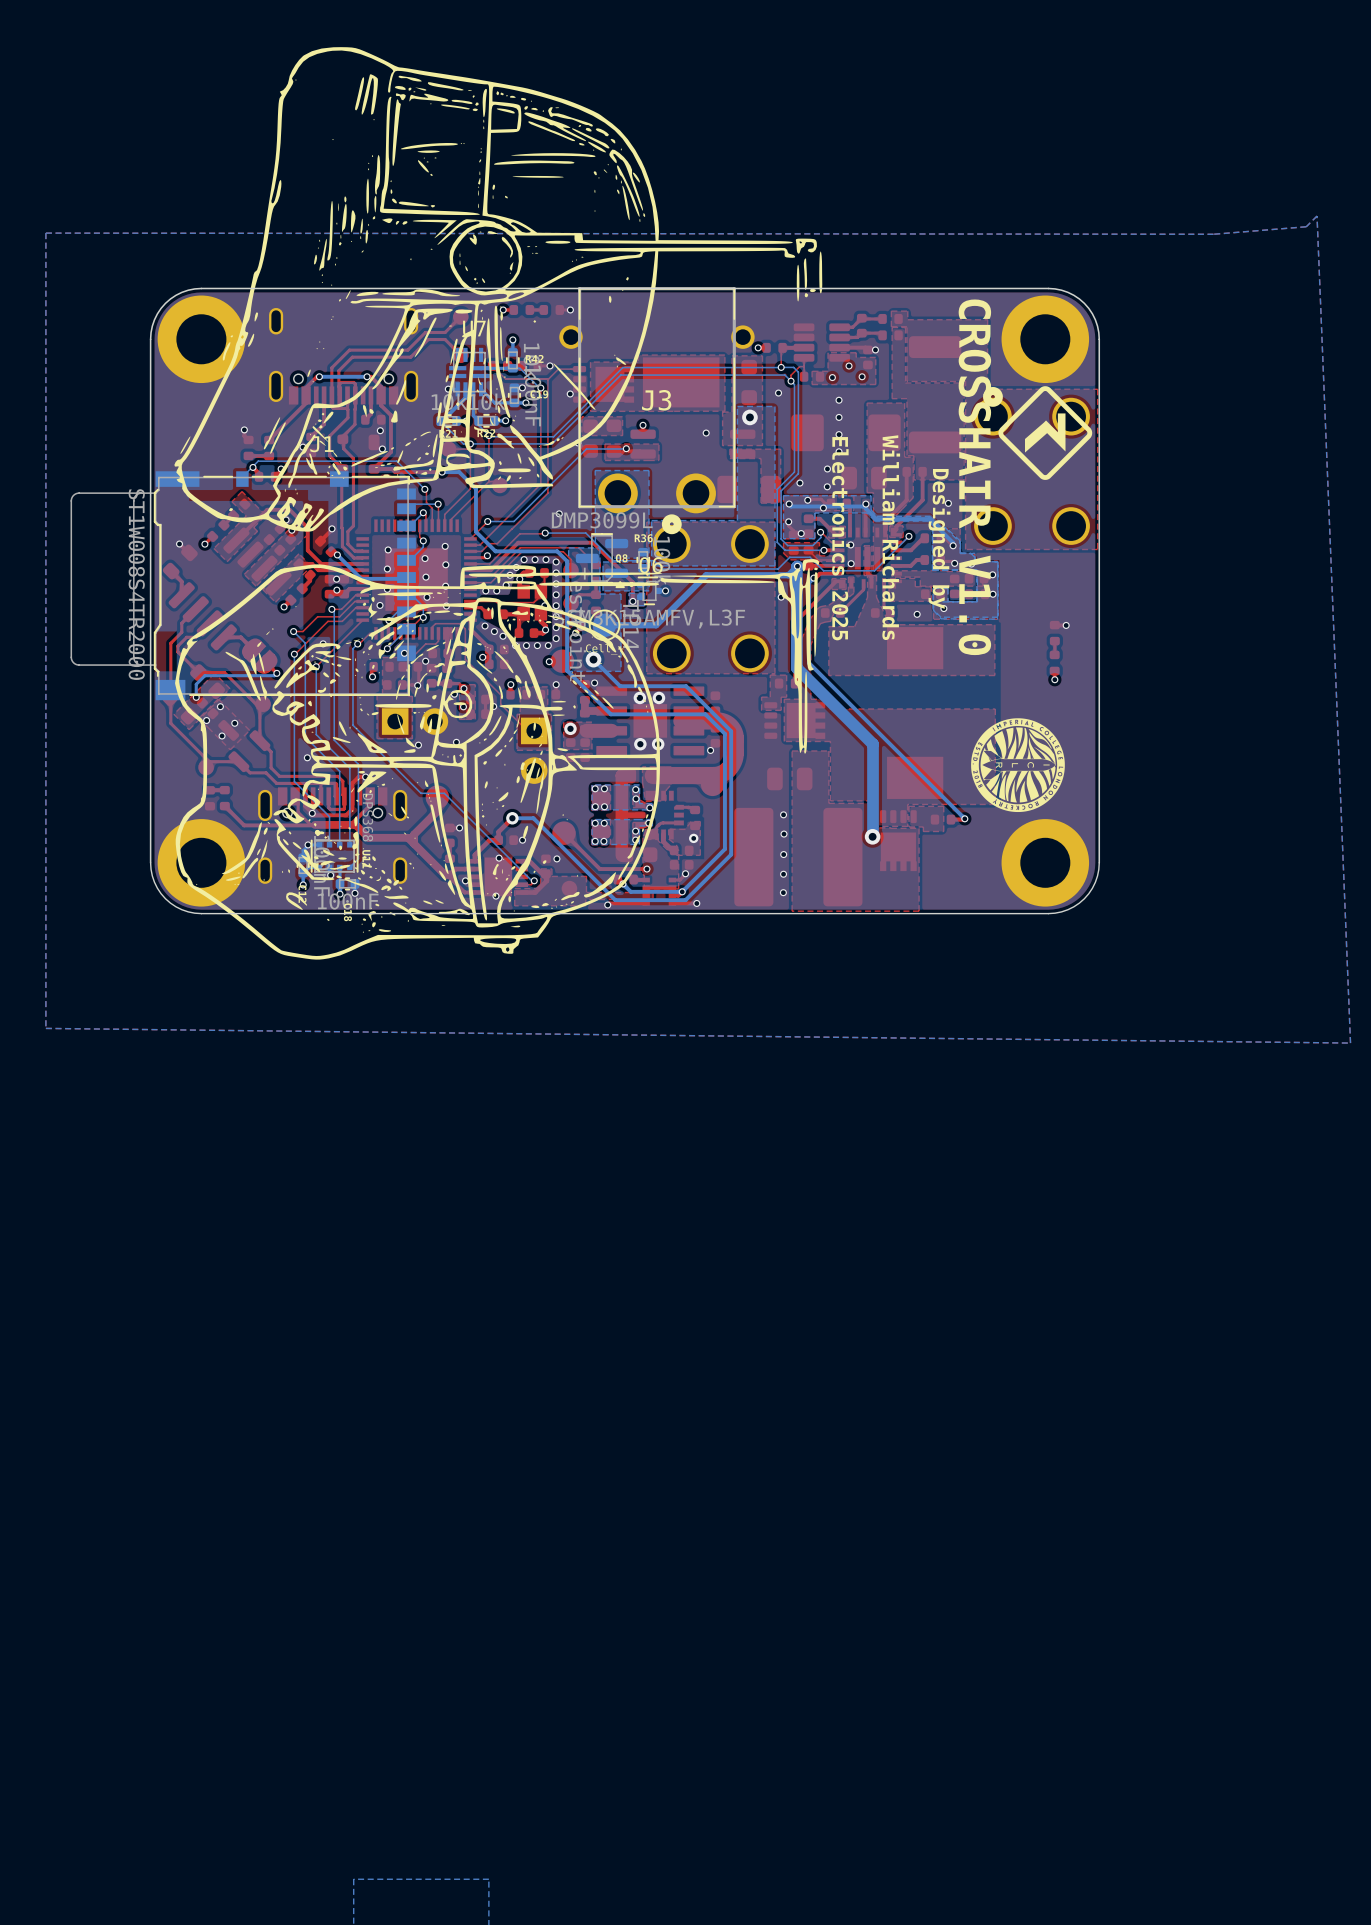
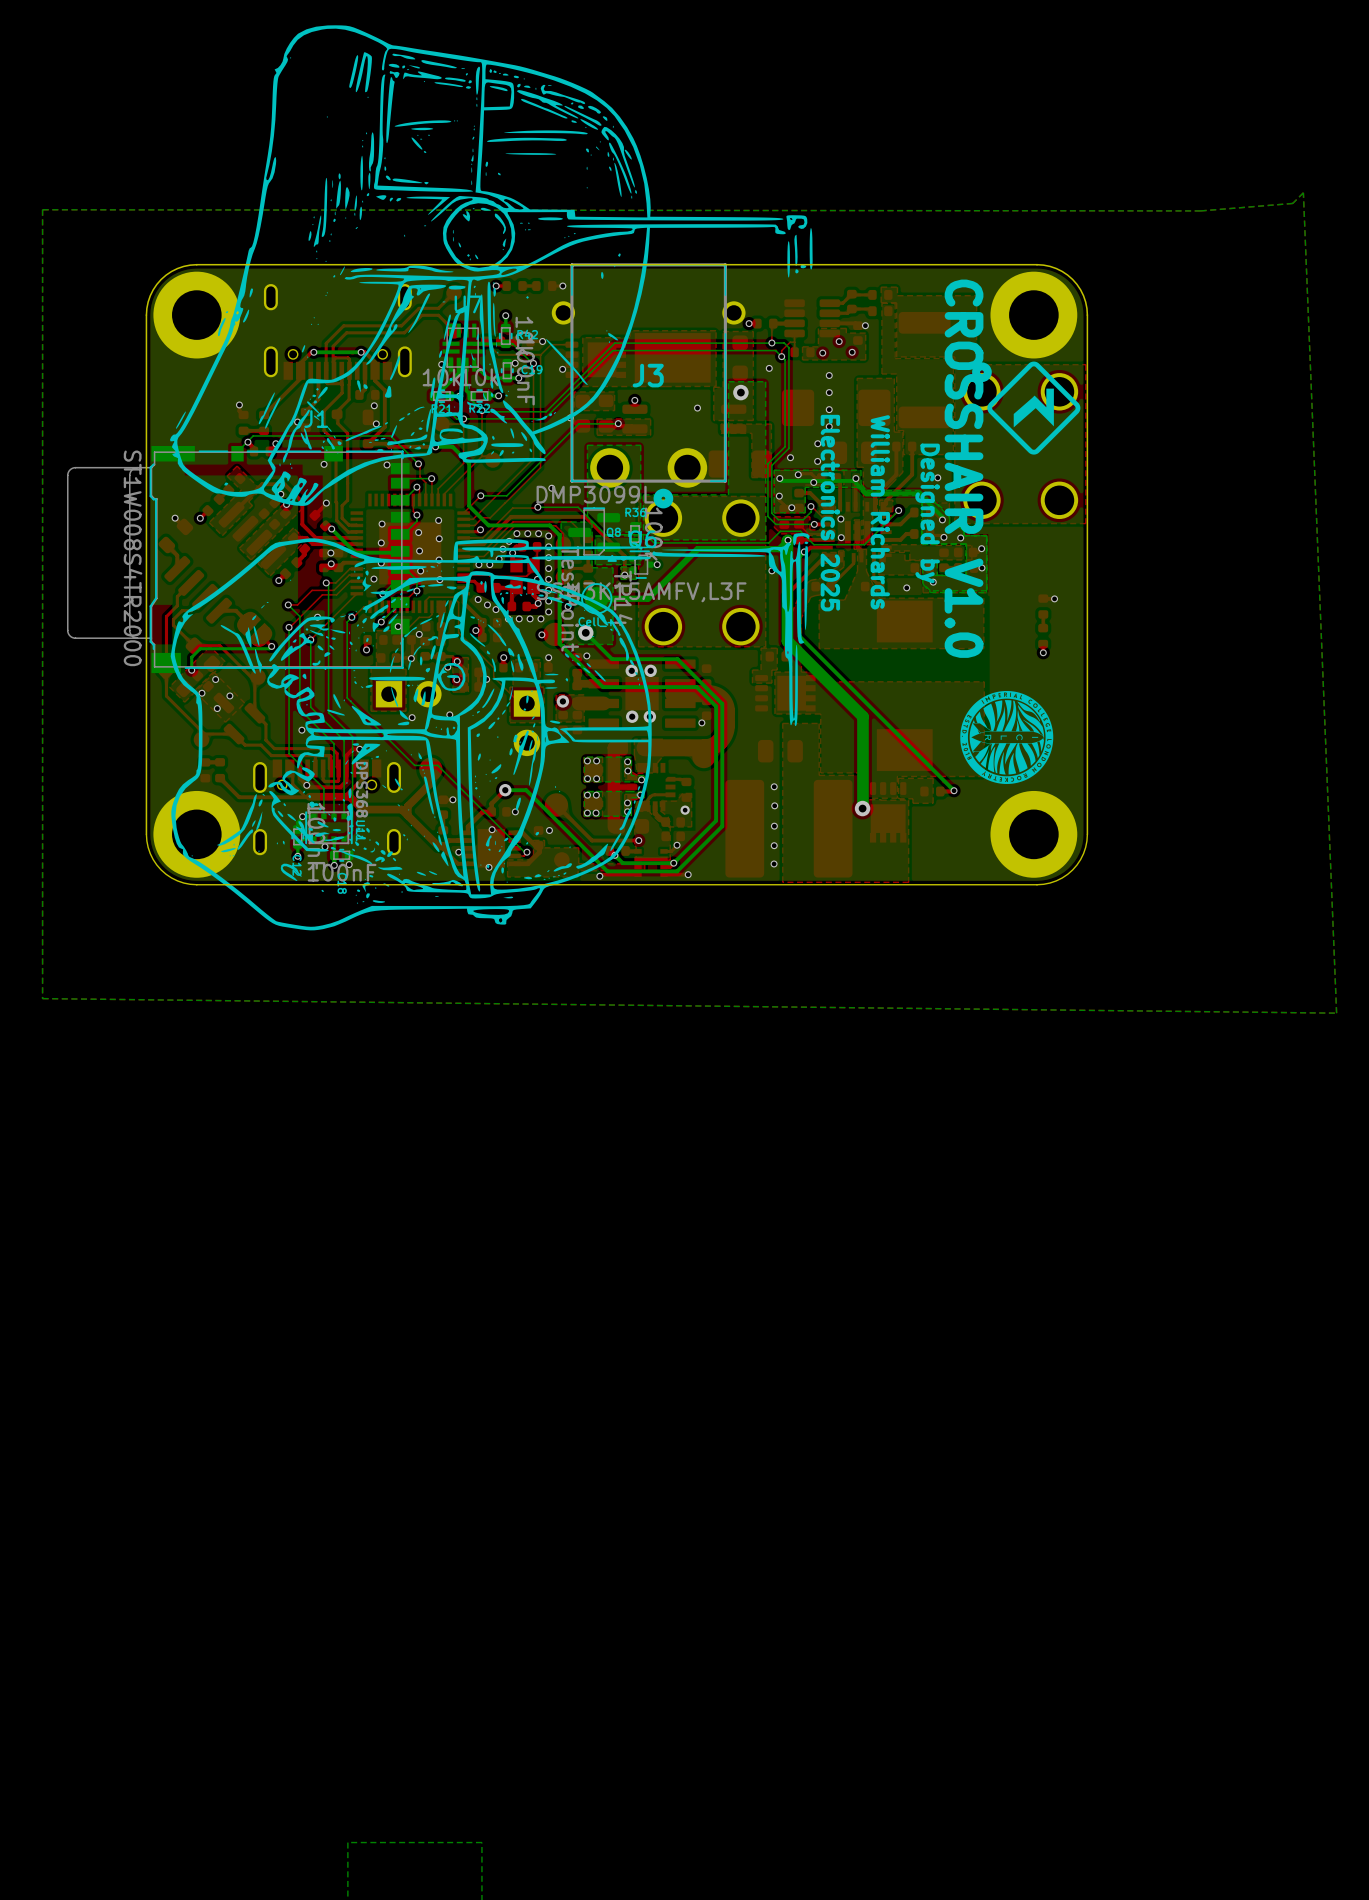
via: none -> (324, 464)
via: none -> (387, 464)

